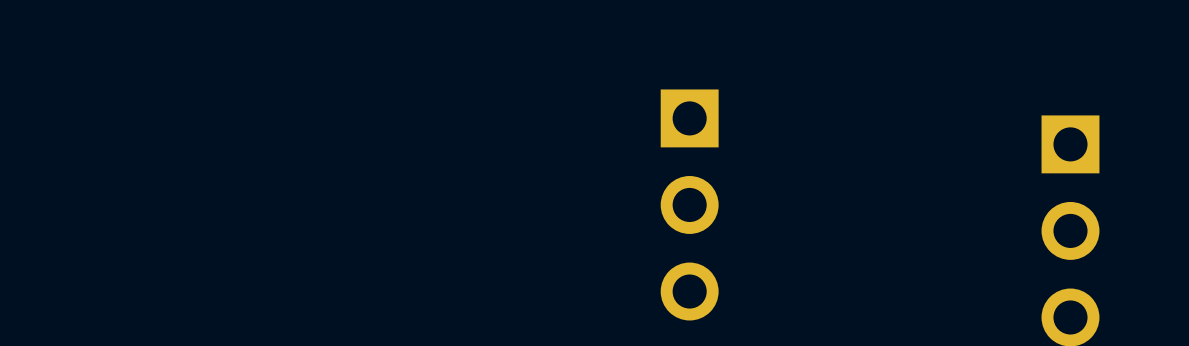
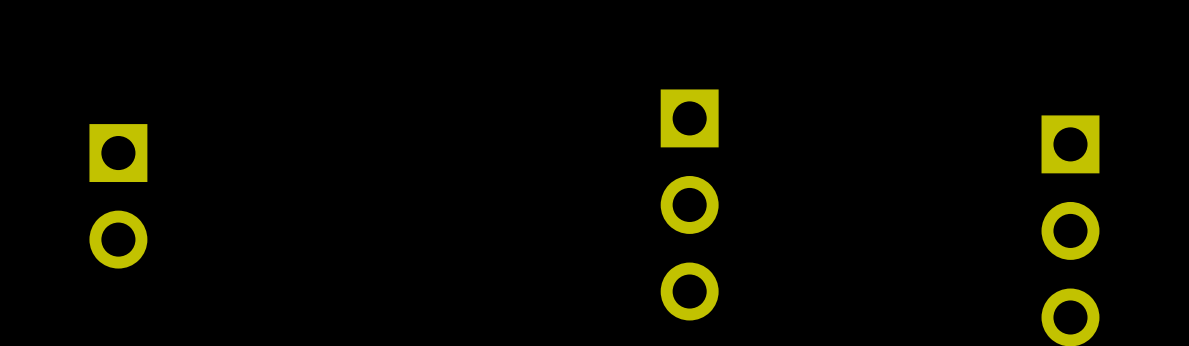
part: none -> (118, 196)

